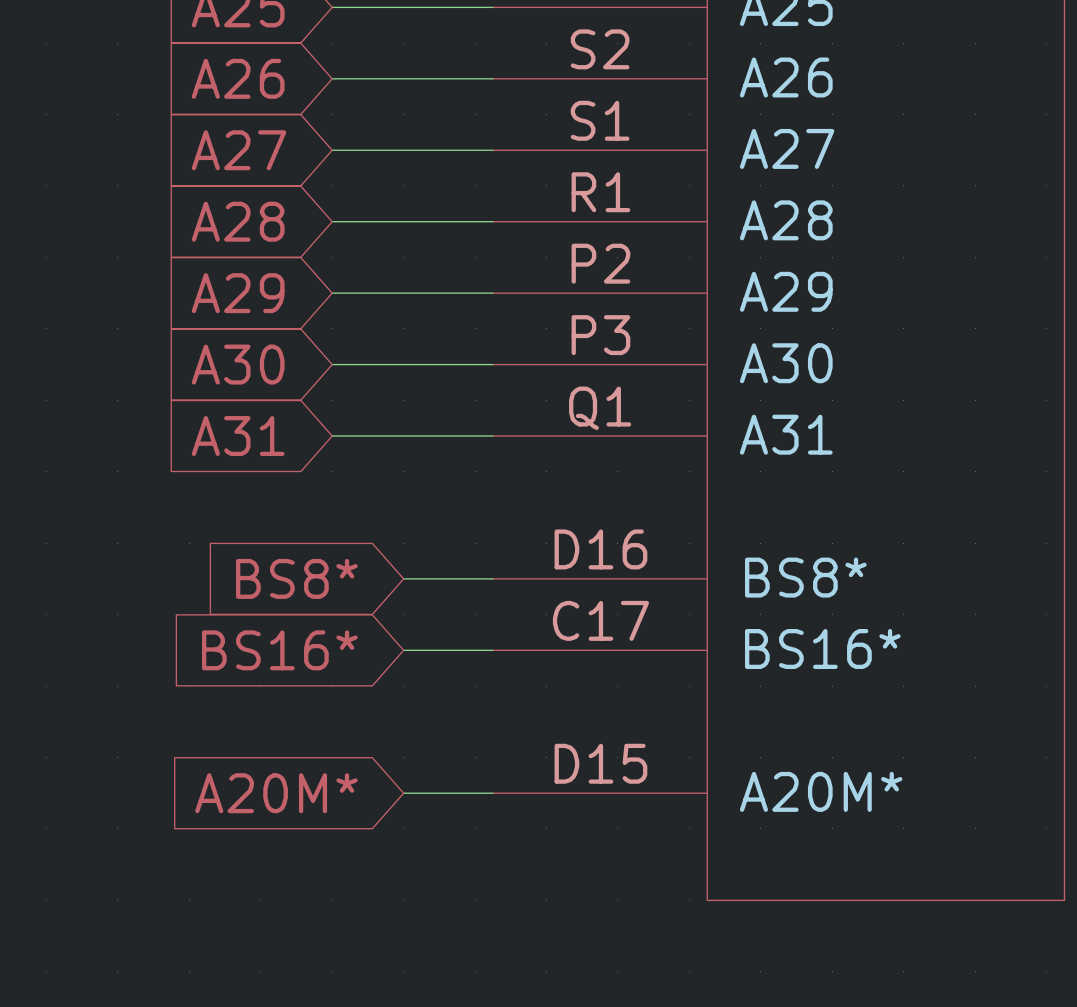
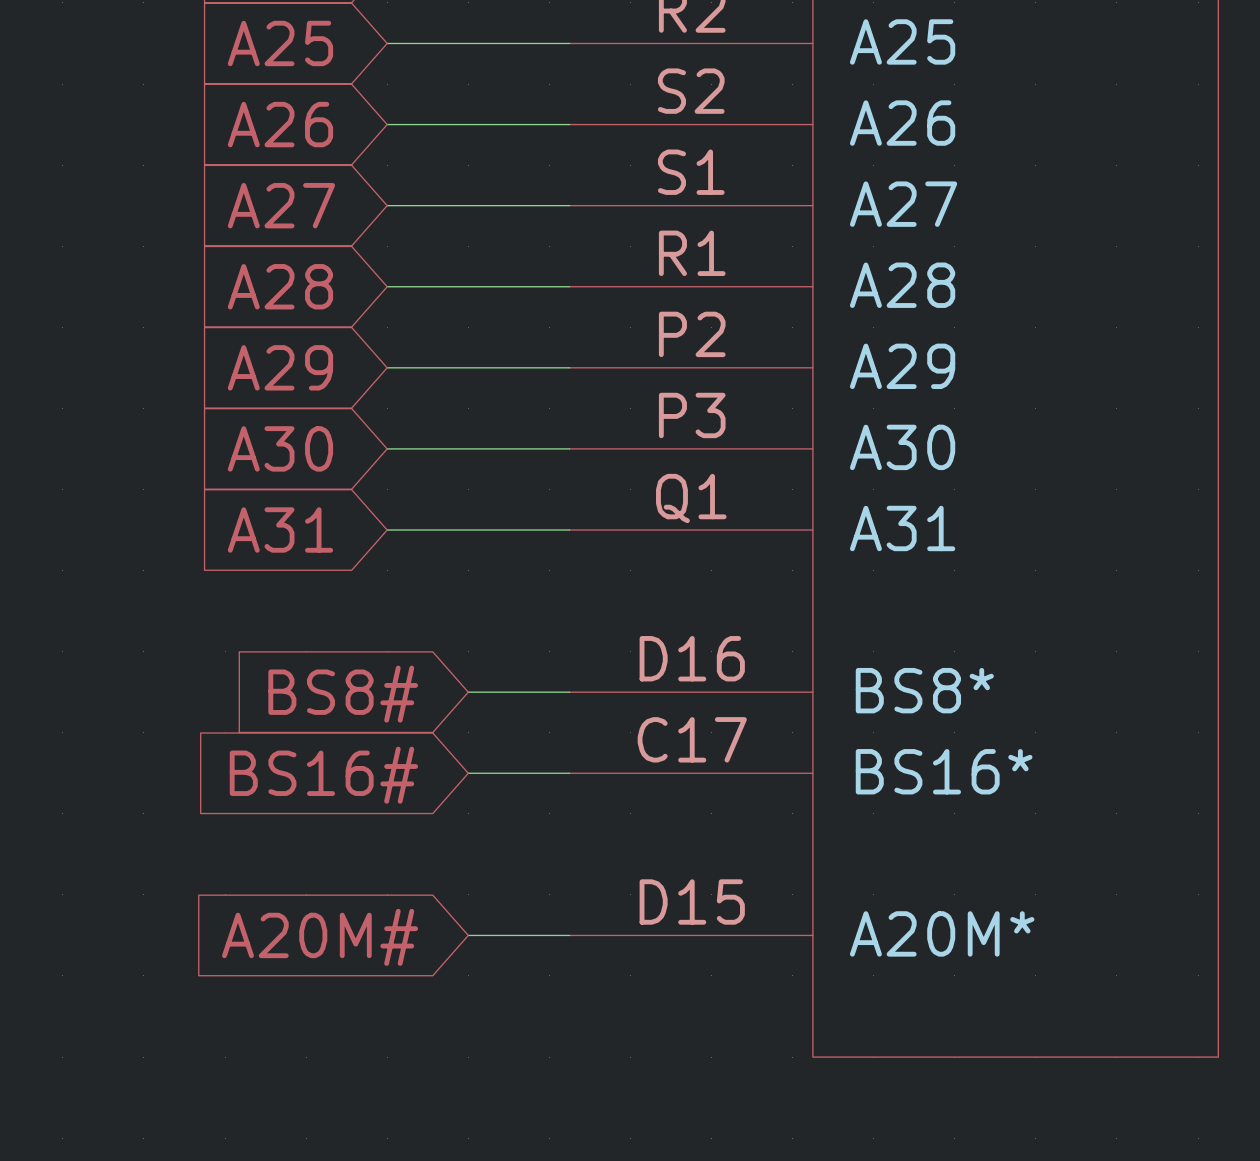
global label: BS8* (296, 578) -> BS8# (343, 694)
global label: BS16* (279, 650) -> BS16# (323, 775)
global label: A20M* (276, 793) -> A20M# (320, 937)

